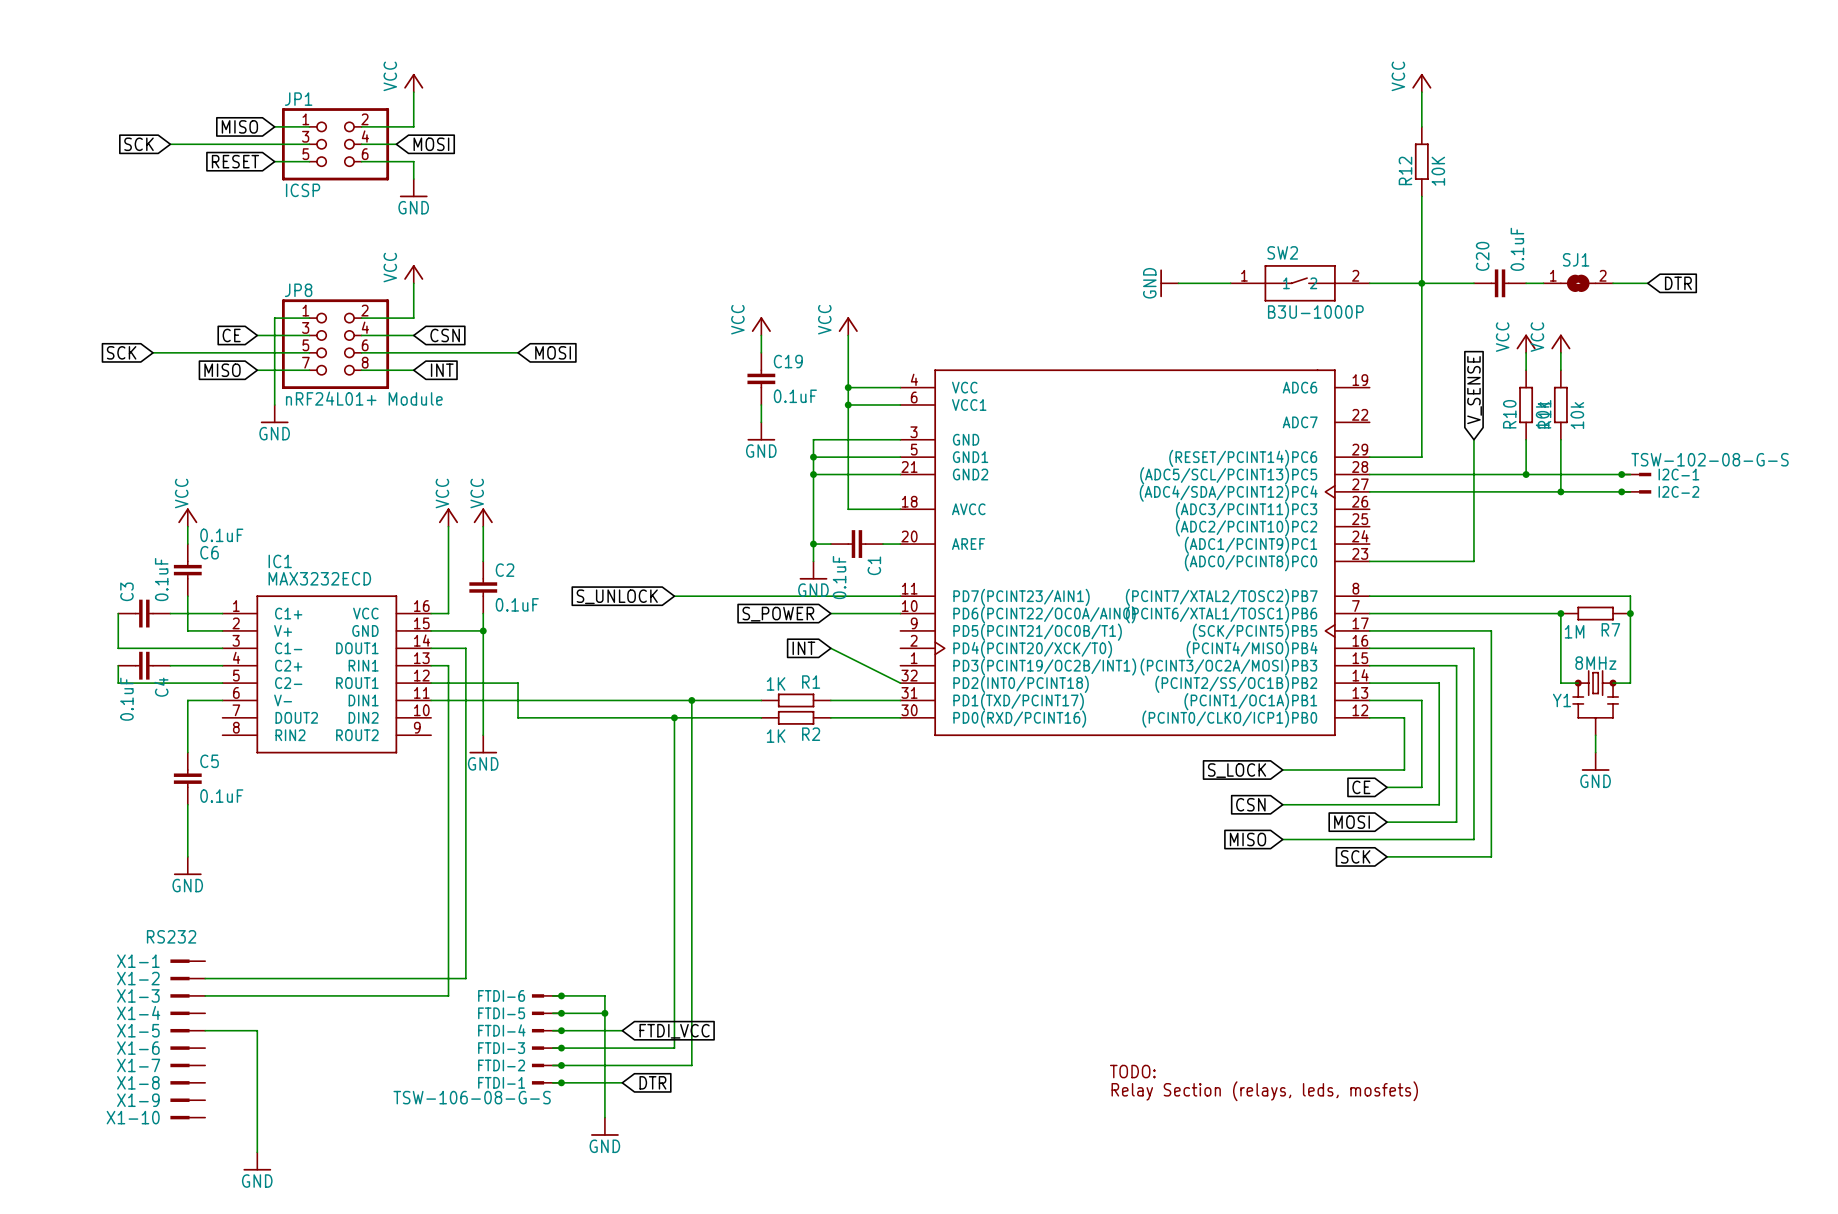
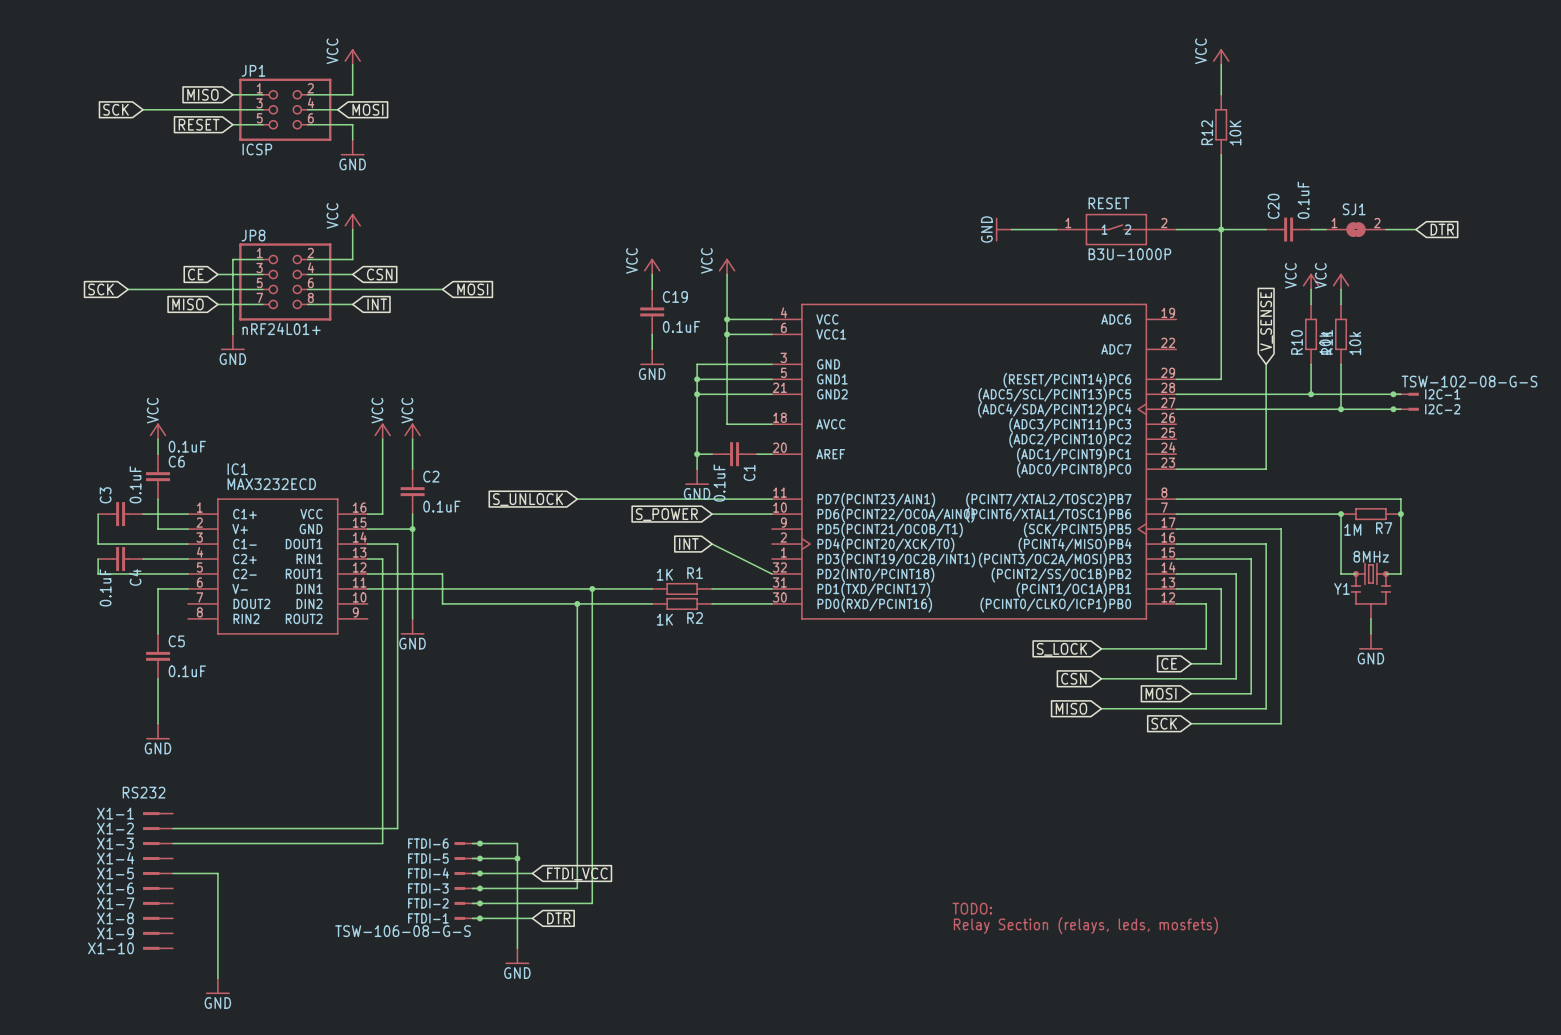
SW2 name: SW2 (1282, 252) -> RESET (1109, 203)
JP8 value: nRF24L01+ Module (364, 398) -> nRF24L01+ (281, 328)

